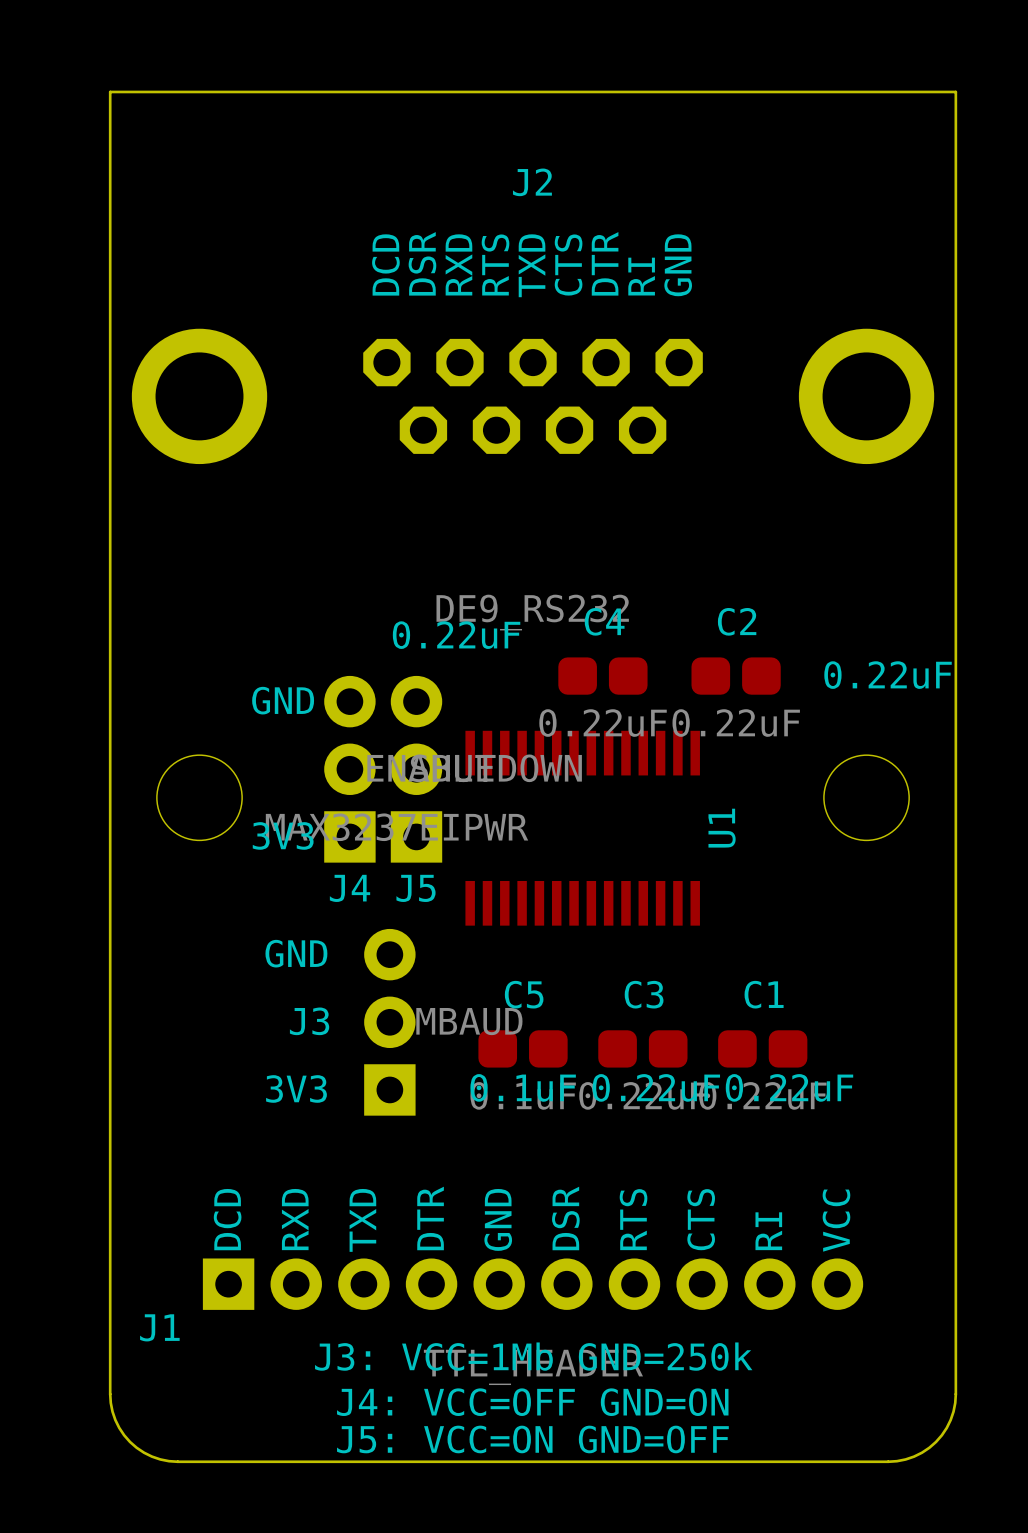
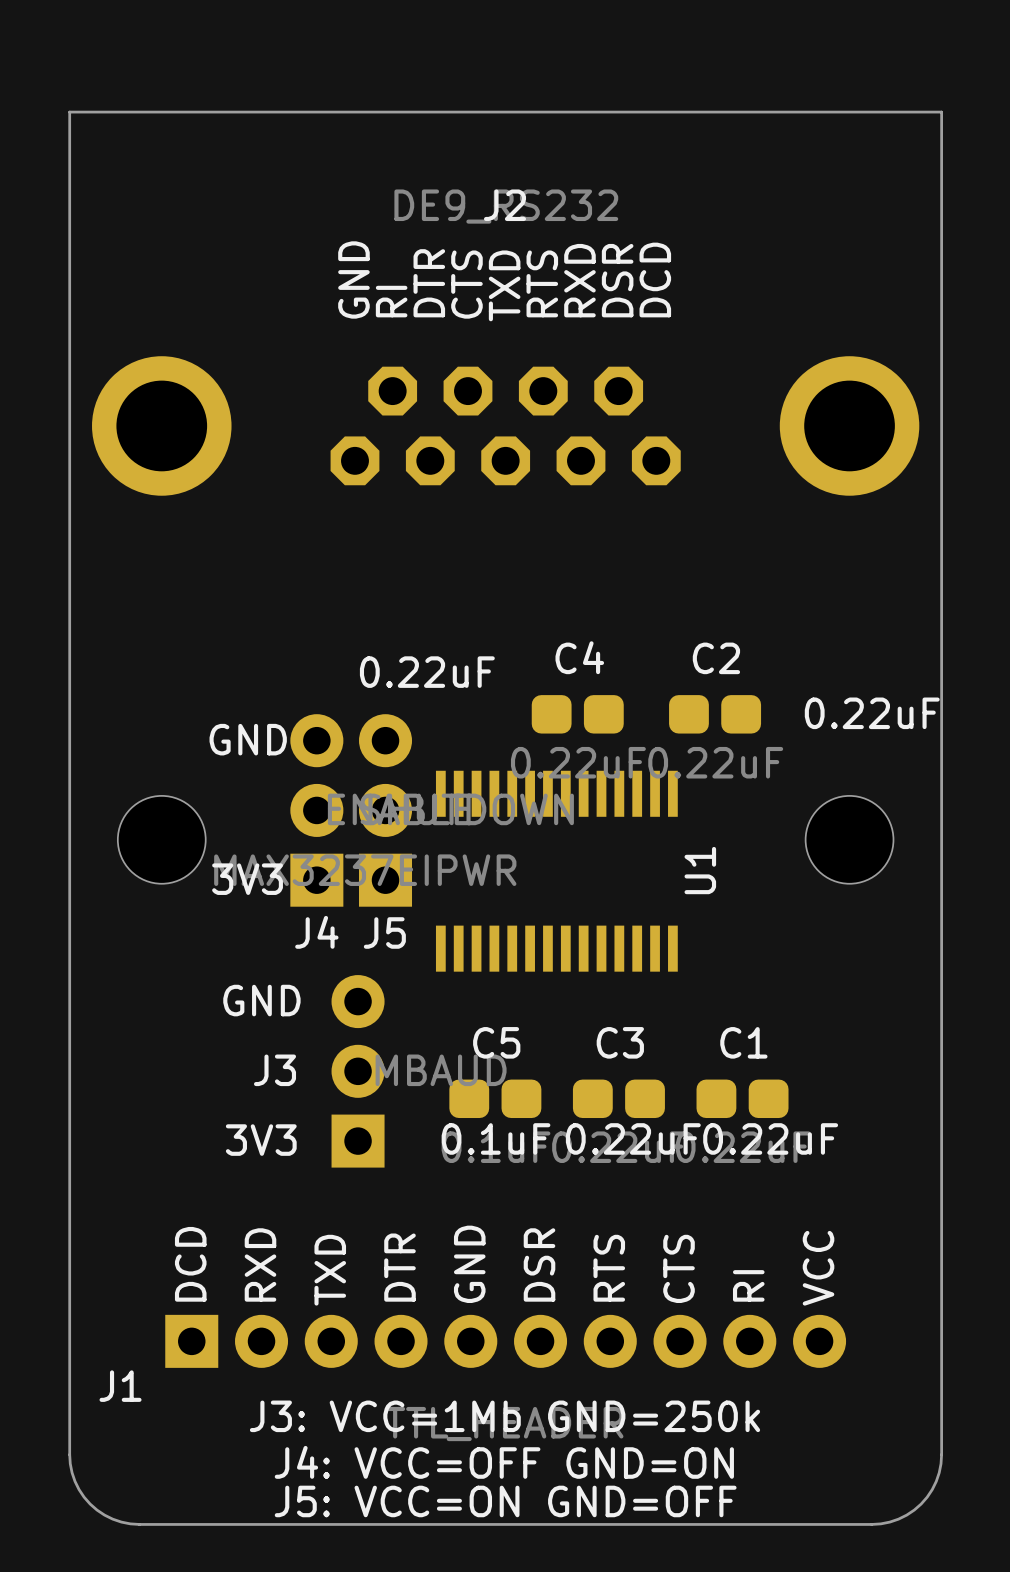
text: DSR (422, 263) -> RI (391, 301)
text: DTR (605, 263) -> RXD (579, 280)
text: DCD (385, 264) -> GND (353, 279)
text: RXD (458, 264) -> DTR (429, 283)
text: RTS (495, 264) -> CTS (466, 284)
text: CTS (568, 265) -> RTS (542, 283)
text: GND (678, 265) -> DCD (655, 279)
text: RI (641, 276) -> DSR (617, 280)
J2 rotation: 0° (533, 396) -> 180° (505, 425)

